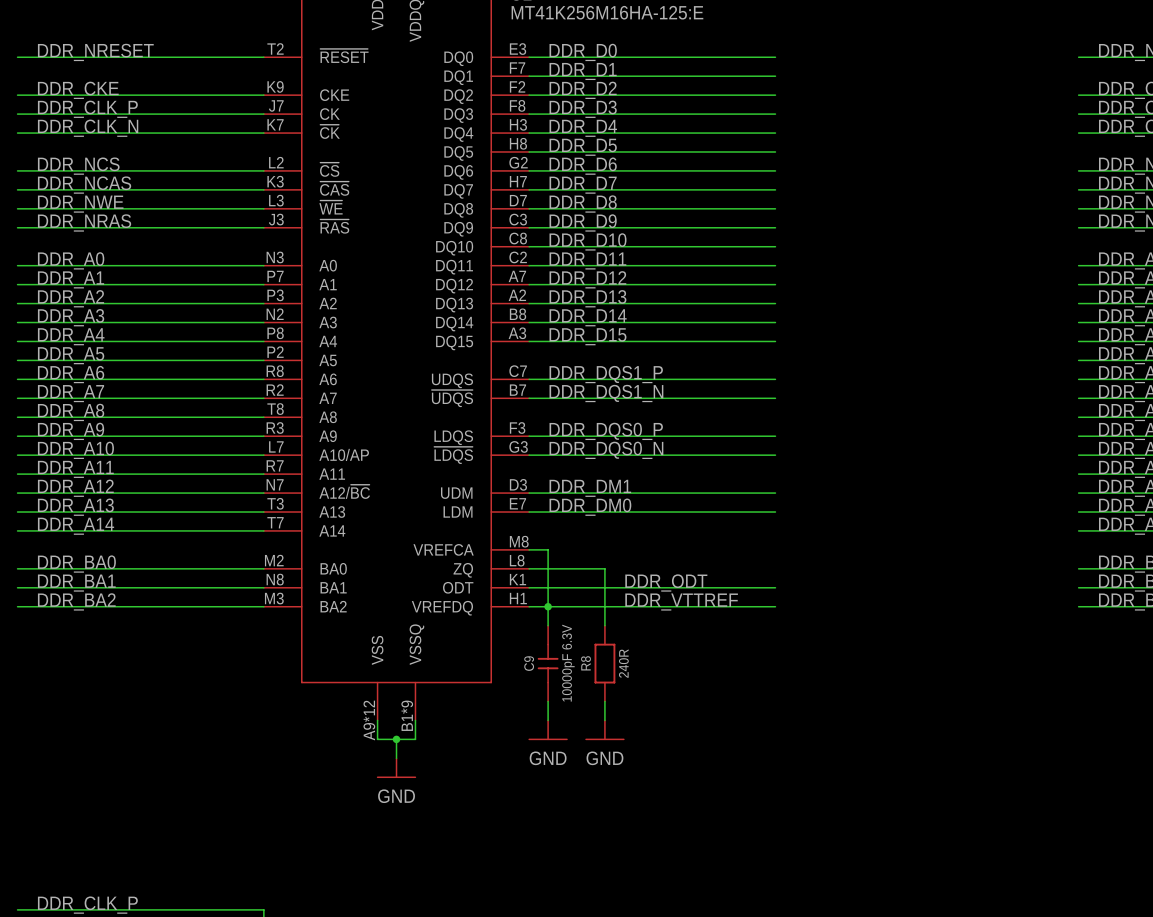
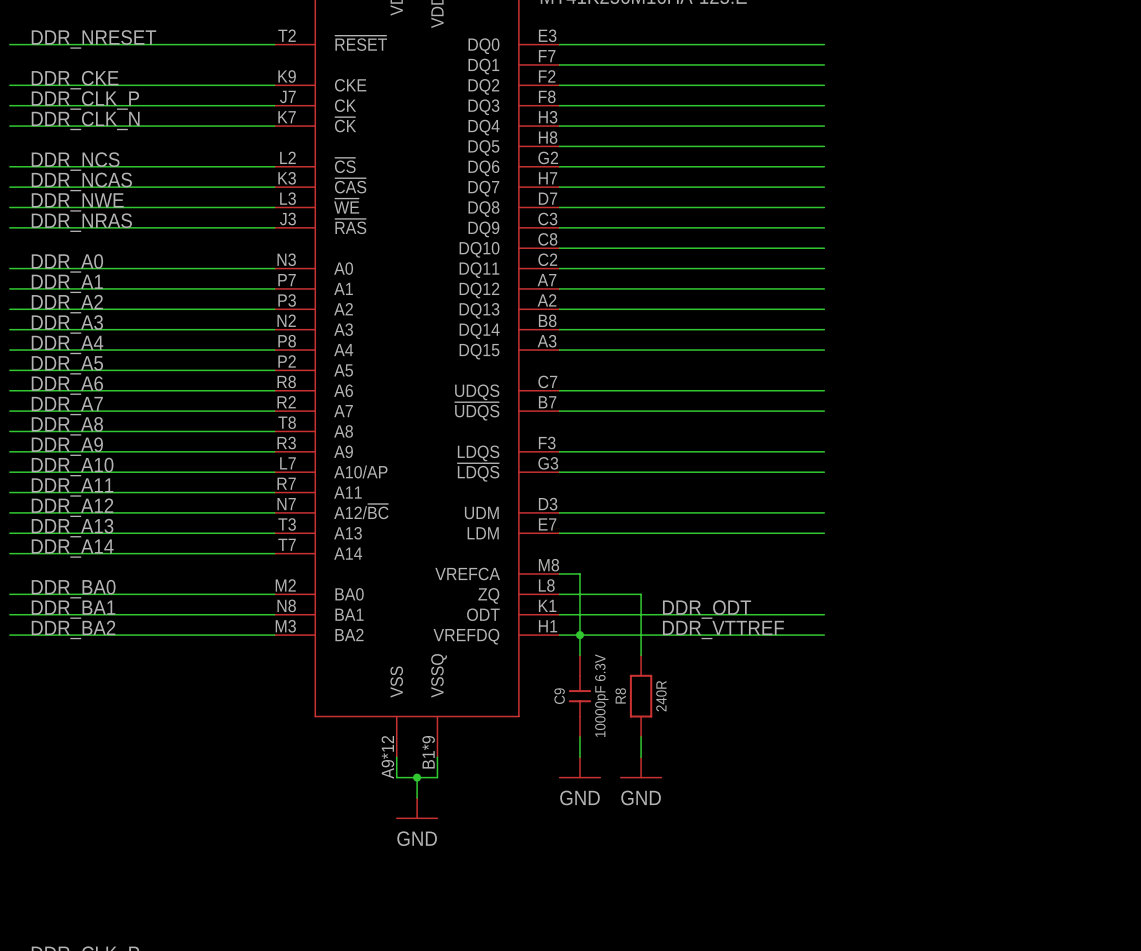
label: DDR_D0 (583, 52) -> none
label: DDR_D1 (583, 71) -> none
label: DDR_D2 (583, 90) -> none
label: DDR_D3 (583, 109) -> none
label: DDR_D4 (583, 128) -> none
label: DDR_D5 (583, 147) -> none
label: DDR_D6 (583, 166) -> none
label: DDR_D7 (583, 185) -> none
label: DDR_D8 (583, 204) -> none
label: DDR_D9 (583, 222) -> none
label: DDR_D10 (588, 241) -> none
label: DDR_D11 (587, 260) -> none
label: DDR_D12 (587, 279) -> none
label: DDR_D13 (587, 298) -> none
label: DDR_D14 (588, 317) -> none
label: DDR_D15 (587, 336) -> none
label: DDR_DQS1_P (606, 374) -> none
label: DDR_DQS1_N (606, 393) -> none
label: DDR_DQS0_P (606, 431) -> none
label: DDR_DQS0_N (606, 450) -> none
label: DDR_DM1 (590, 488) -> none
label: DDR_DM0 (590, 507) -> none

